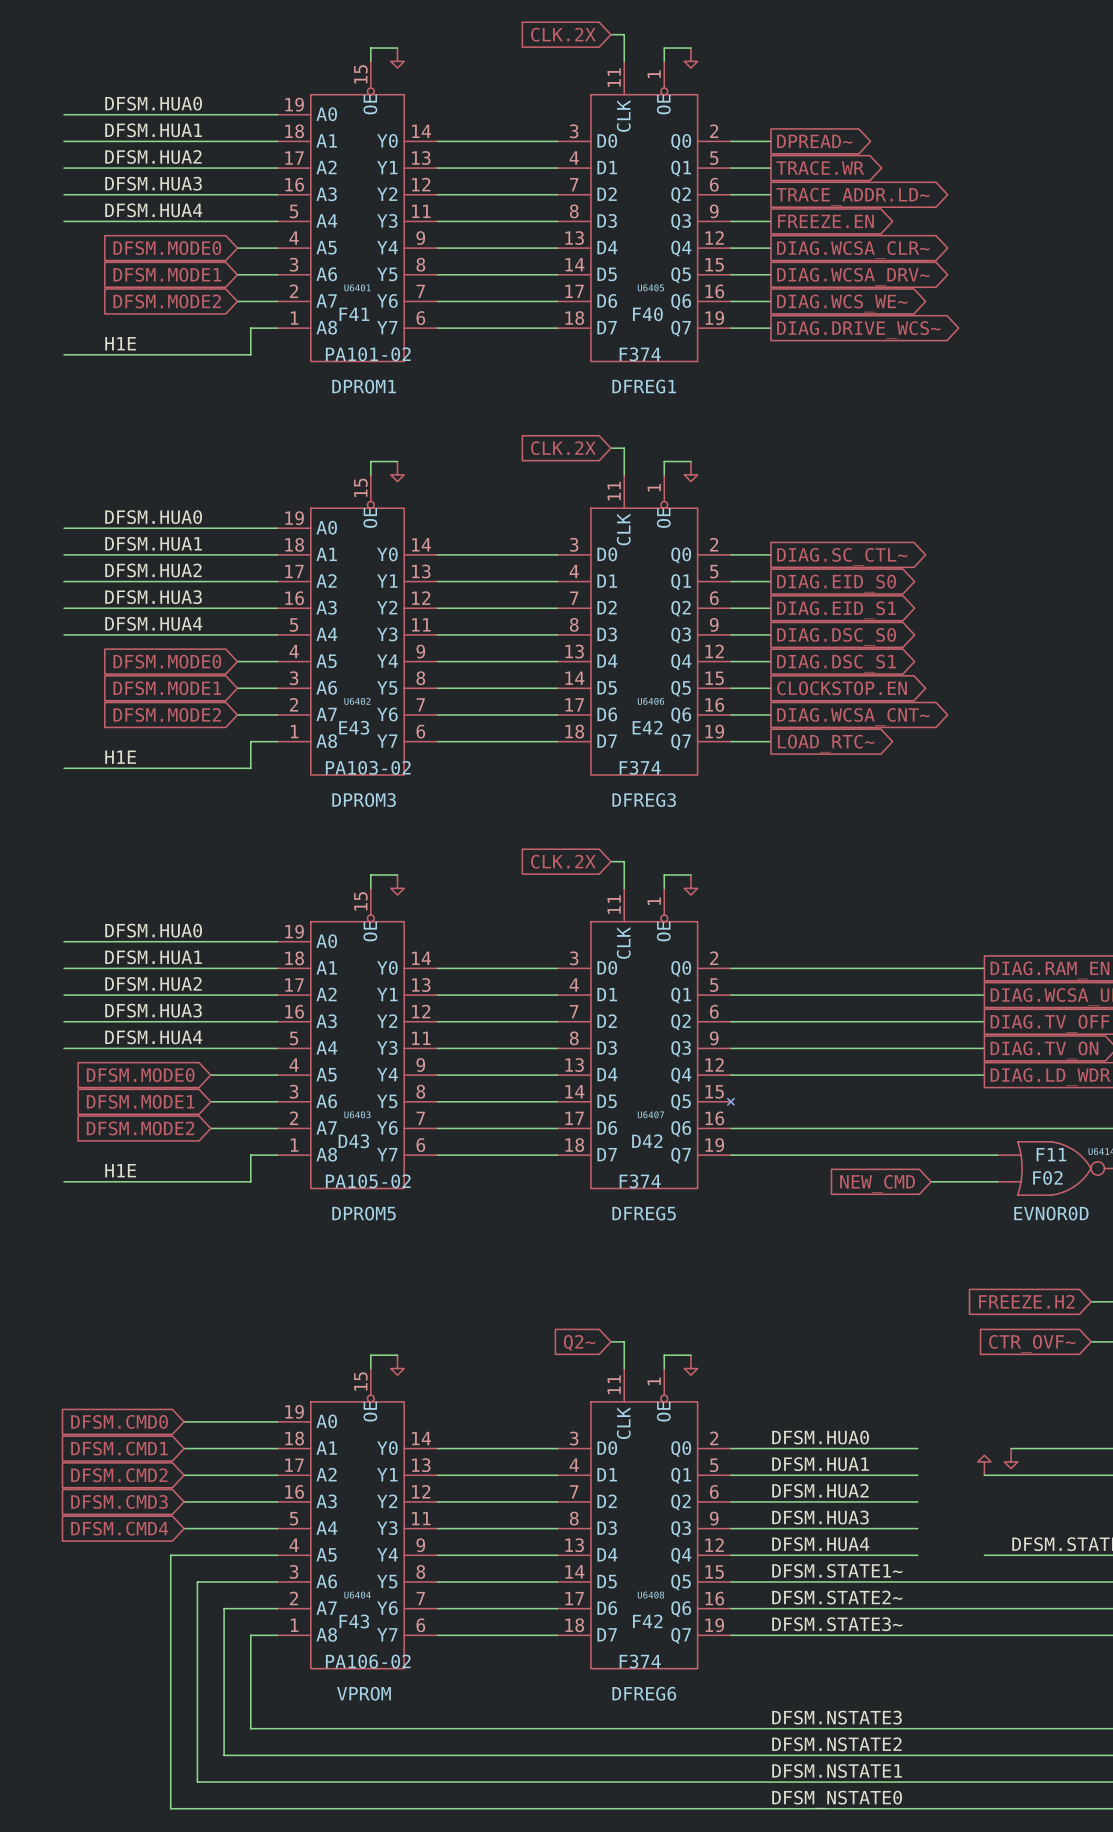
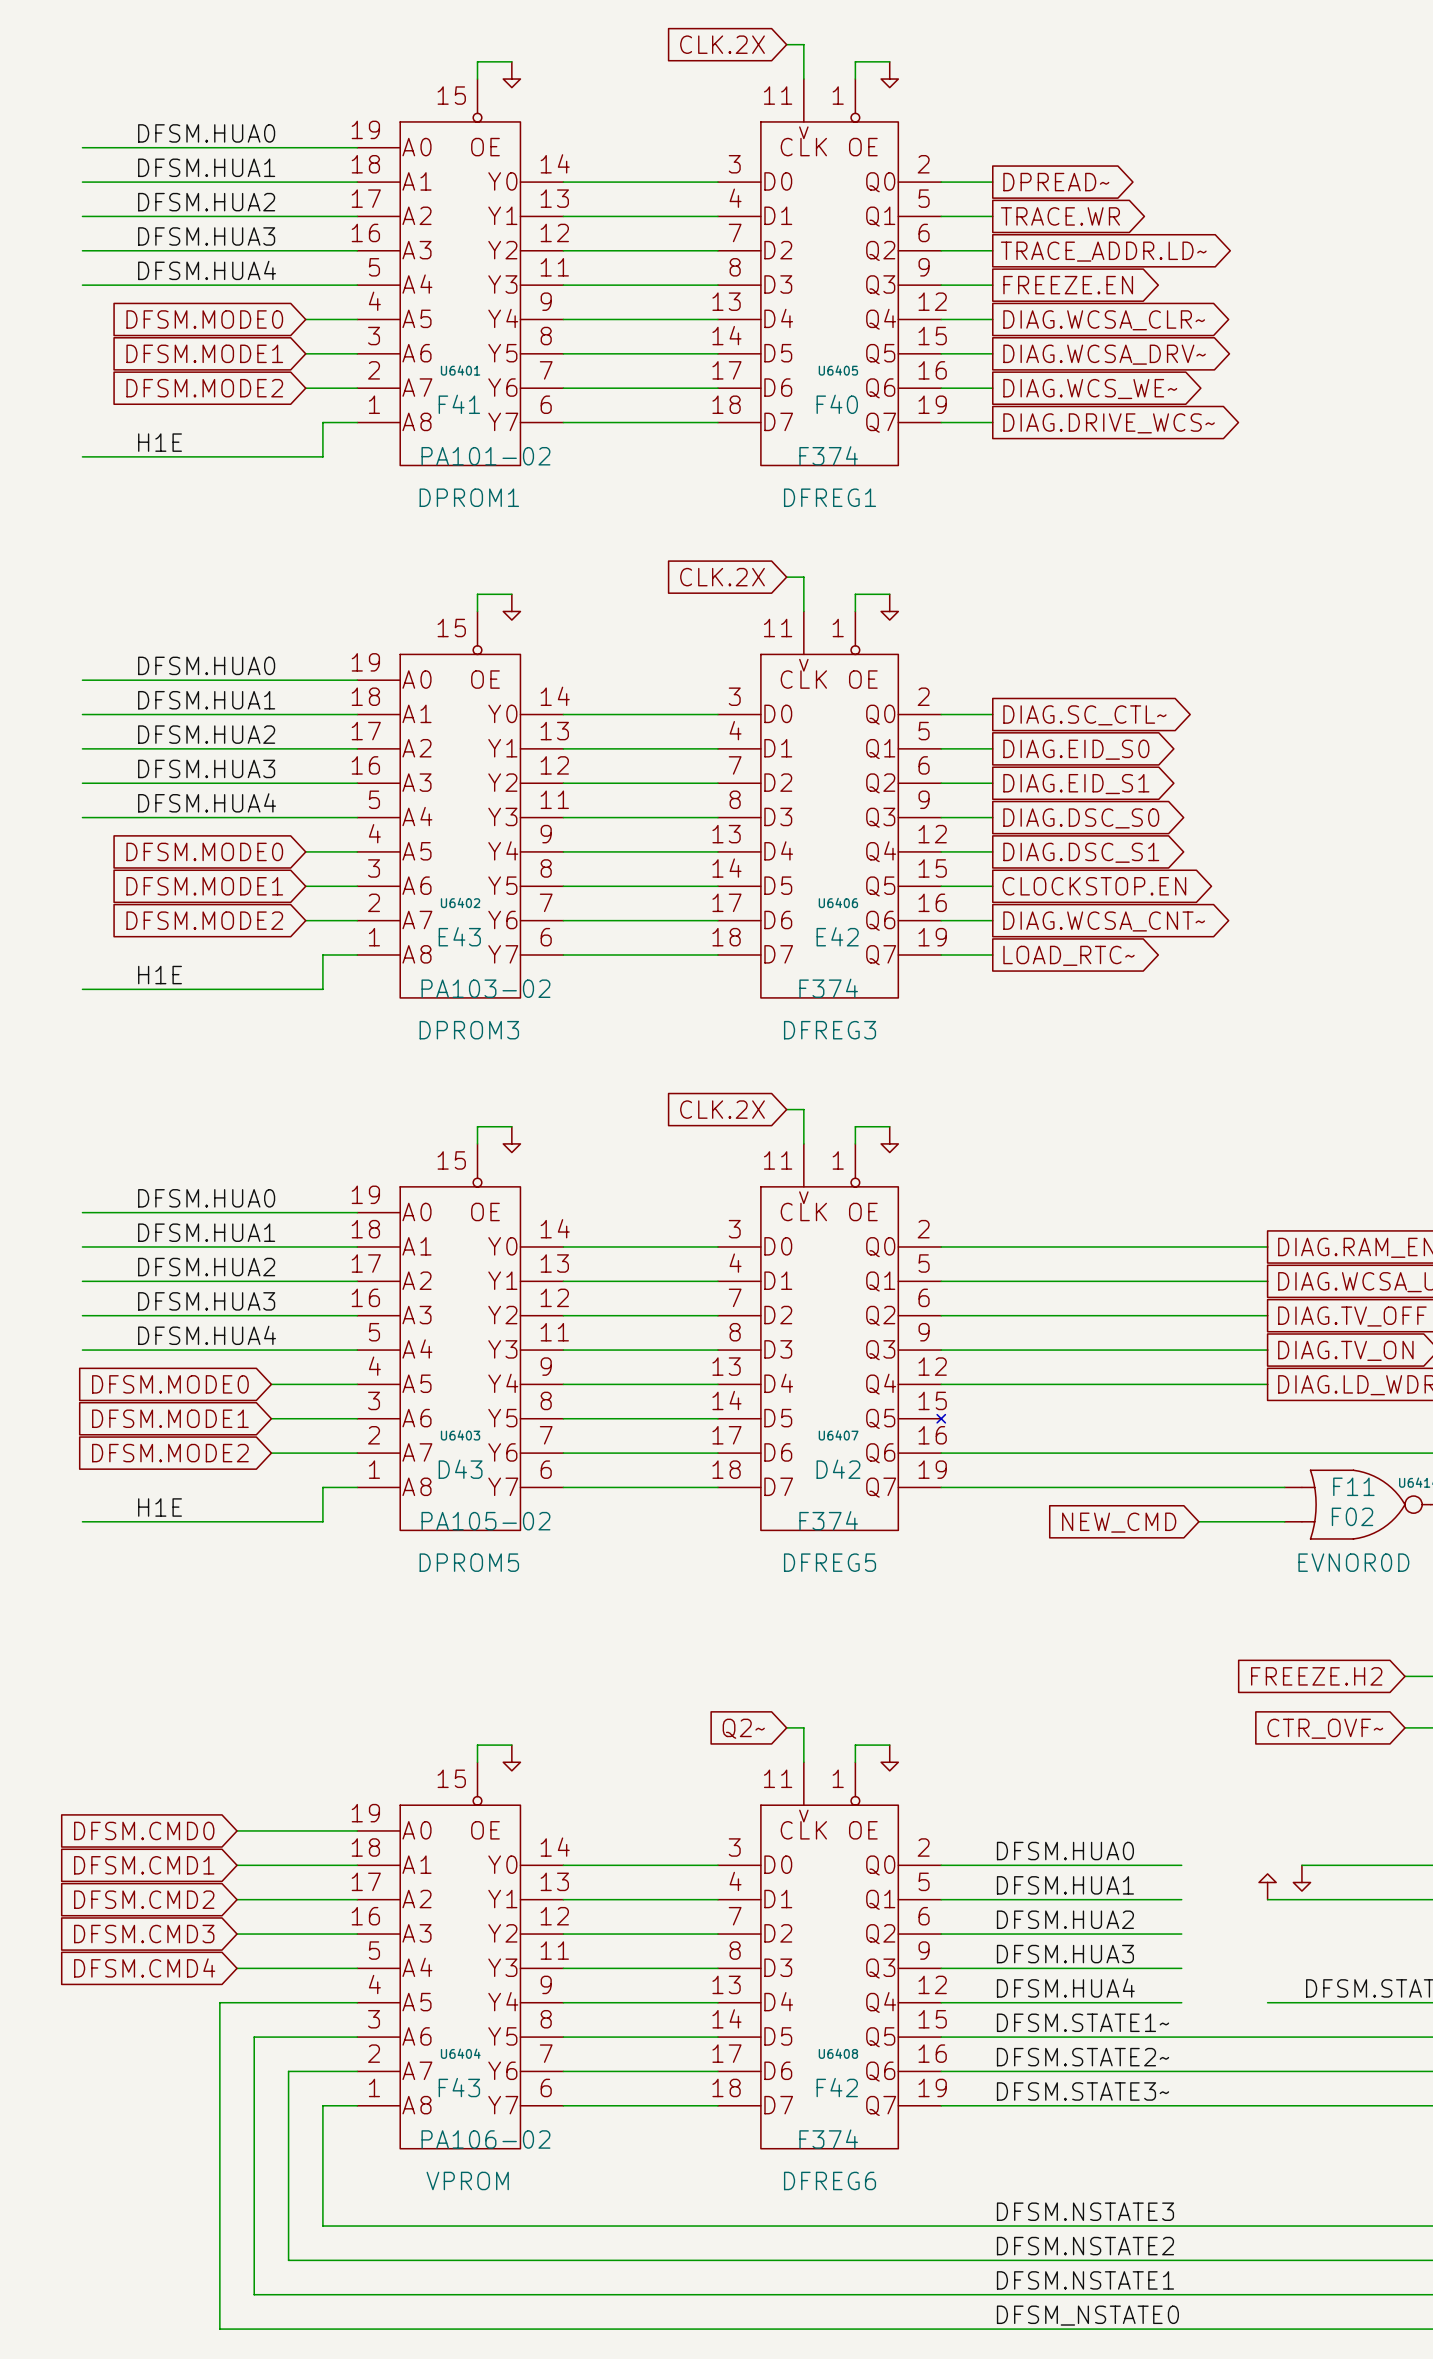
U6401 symbol: [277, 61, 438, 362] -> [357, 79, 564, 466]
U6405 symbol: [557, 61, 731, 362] -> [717, 79, 942, 466]
U6402 symbol: [277, 474, 438, 775] -> [357, 611, 564, 998]
U6406 symbol: [557, 474, 731, 775] -> [717, 611, 942, 998]
U6403 symbol: [277, 888, 438, 1189] -> [357, 1143, 564, 1531]
U6407 symbol: [557, 888, 731, 1189] -> [717, 1143, 942, 1531]
U6404 symbol: [277, 1368, 438, 1669] -> [357, 1762, 564, 2149]
U6408 symbol: [557, 1368, 731, 1669] -> [717, 1762, 942, 2149]

